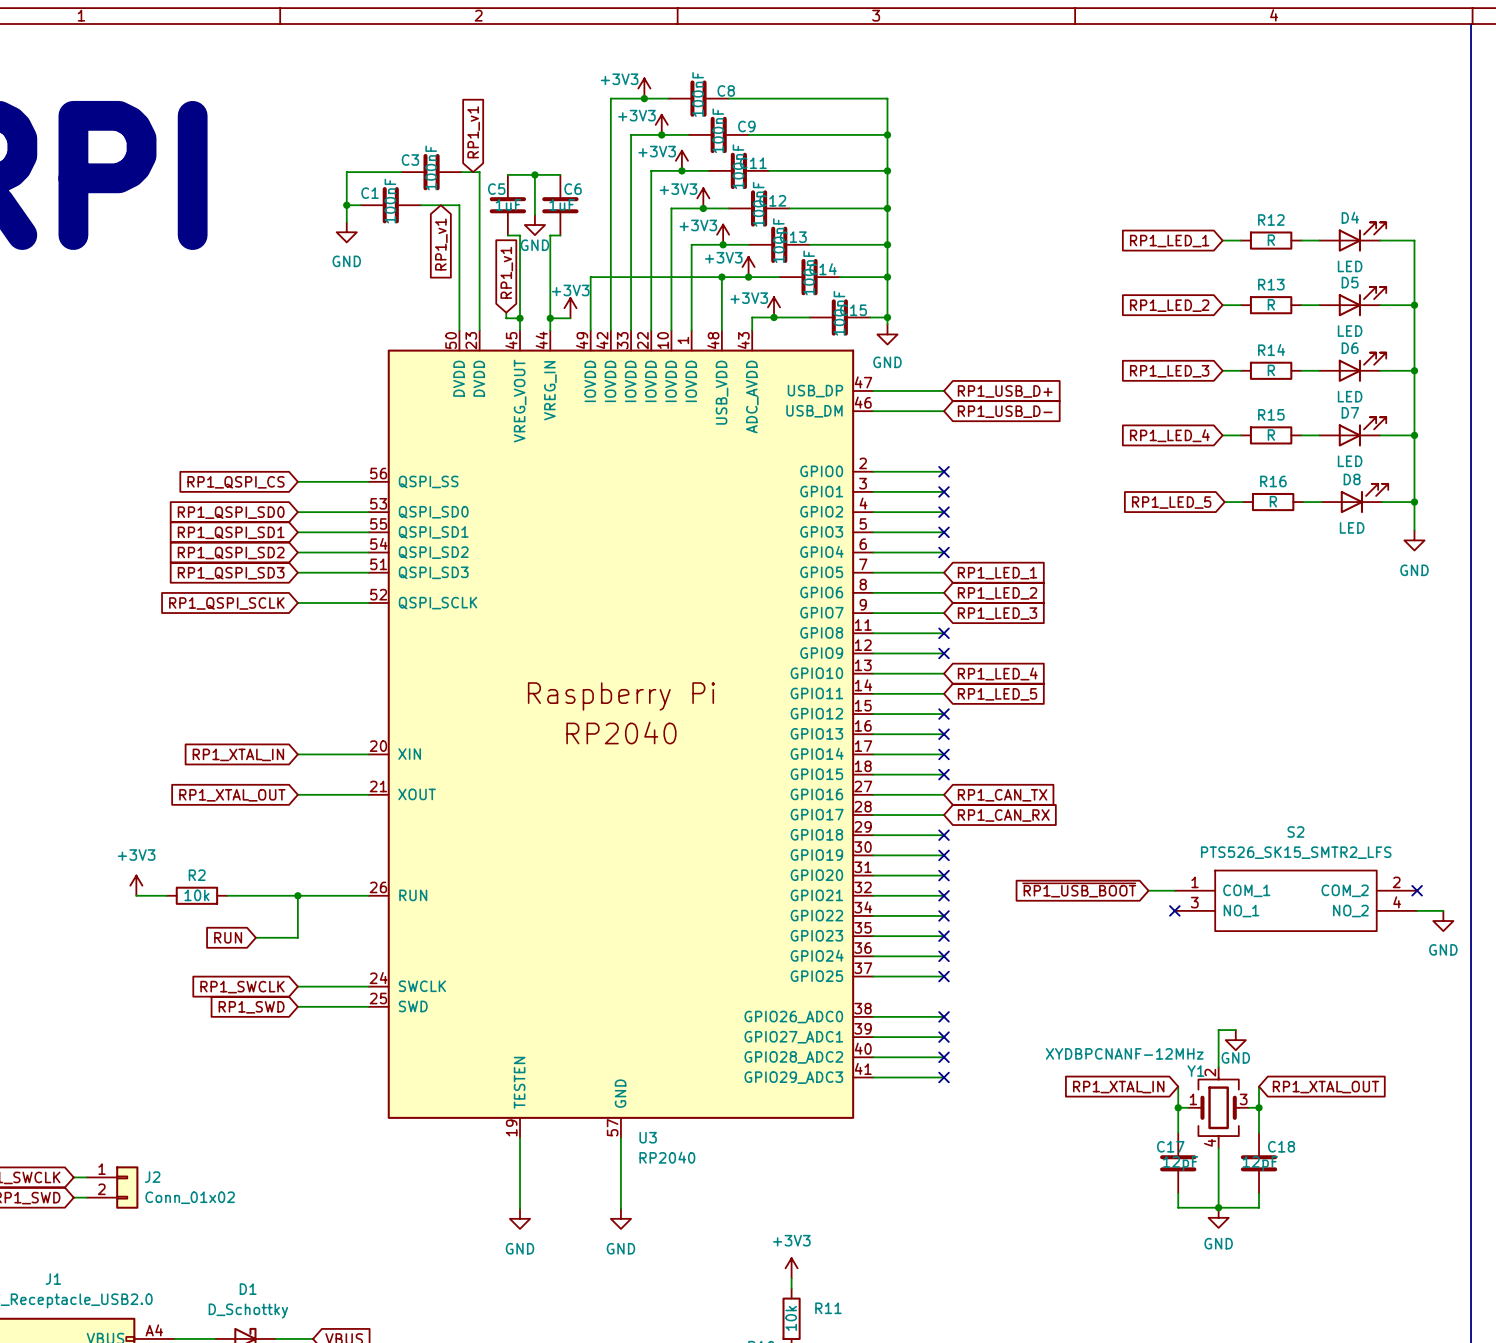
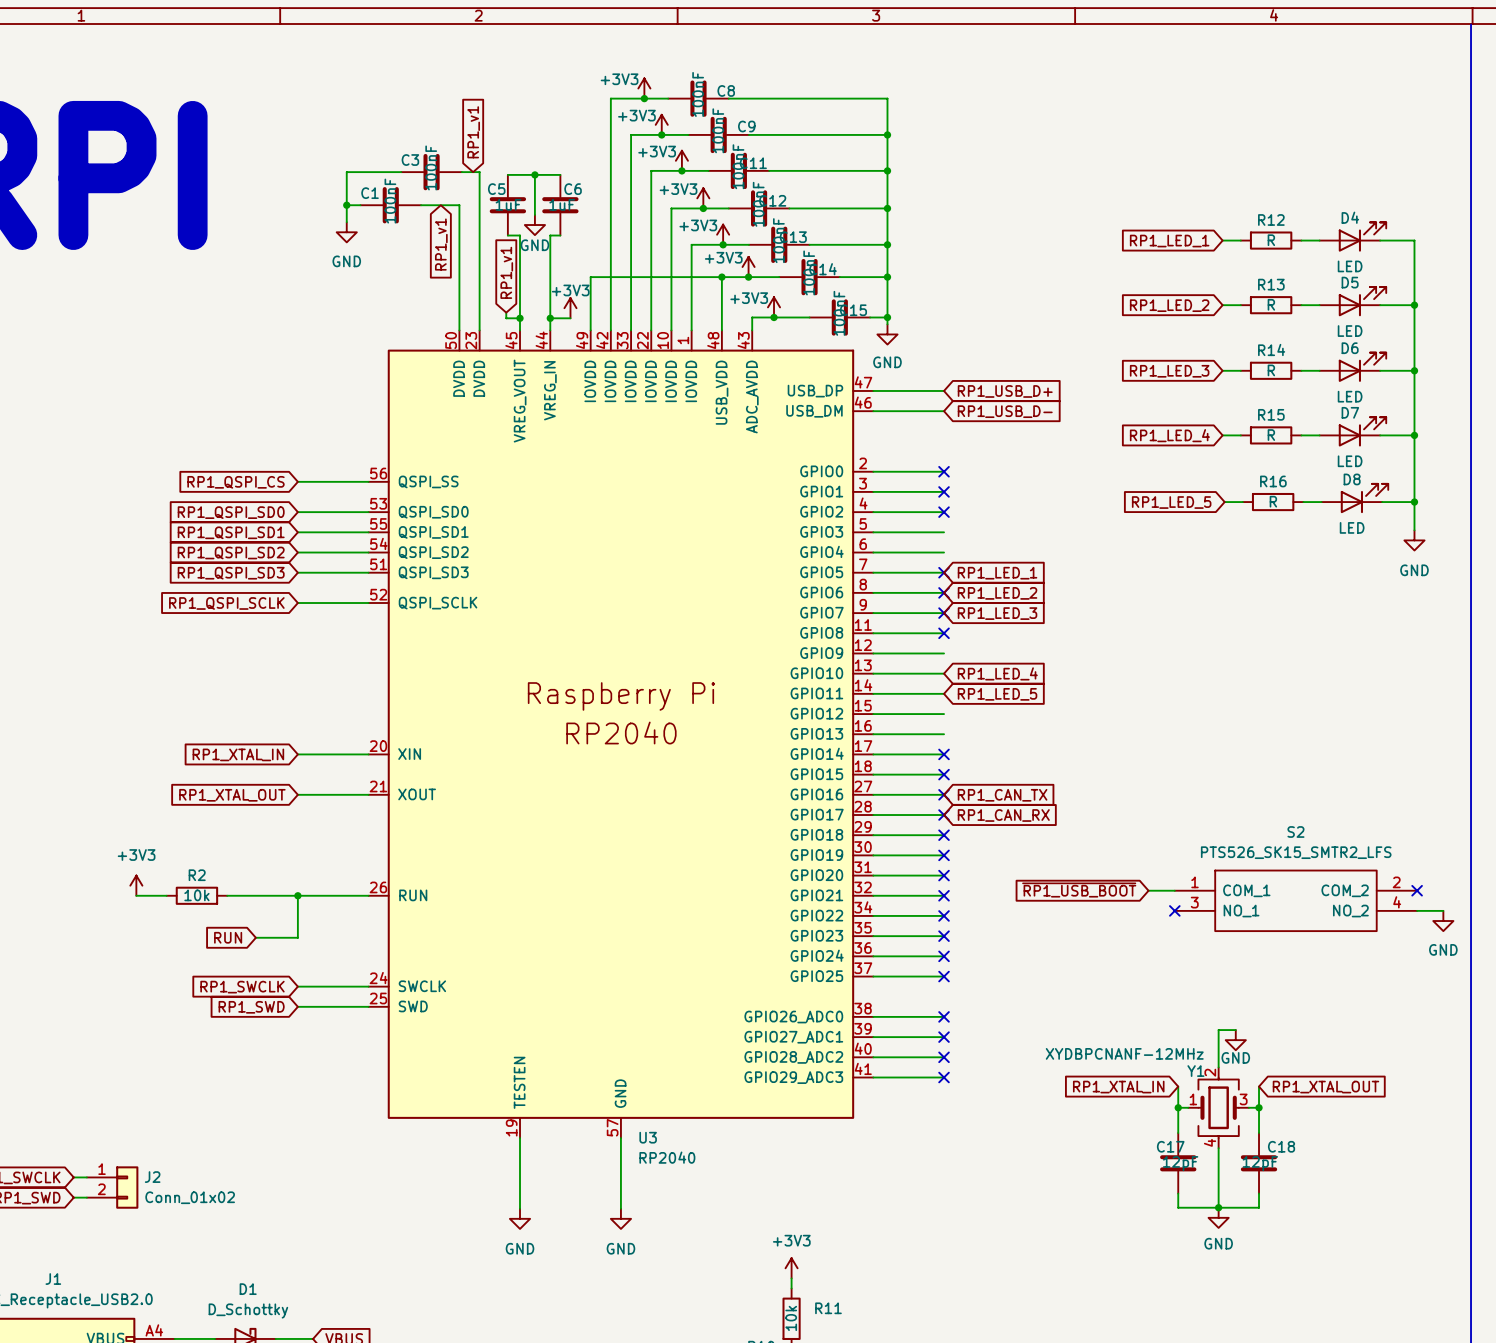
no-connect mark: (944, 532) -> none
no-connect mark: (944, 552) -> none
no-connect mark: none -> (944, 572)
no-connect mark: none -> (944, 592)
no-connect mark: none -> (944, 613)
no-connect mark: (944, 653) -> none
no-connect mark: (944, 714) -> none
no-connect mark: (944, 734) -> none
no-connect mark: none -> (944, 794)
no-connect mark: none -> (944, 815)

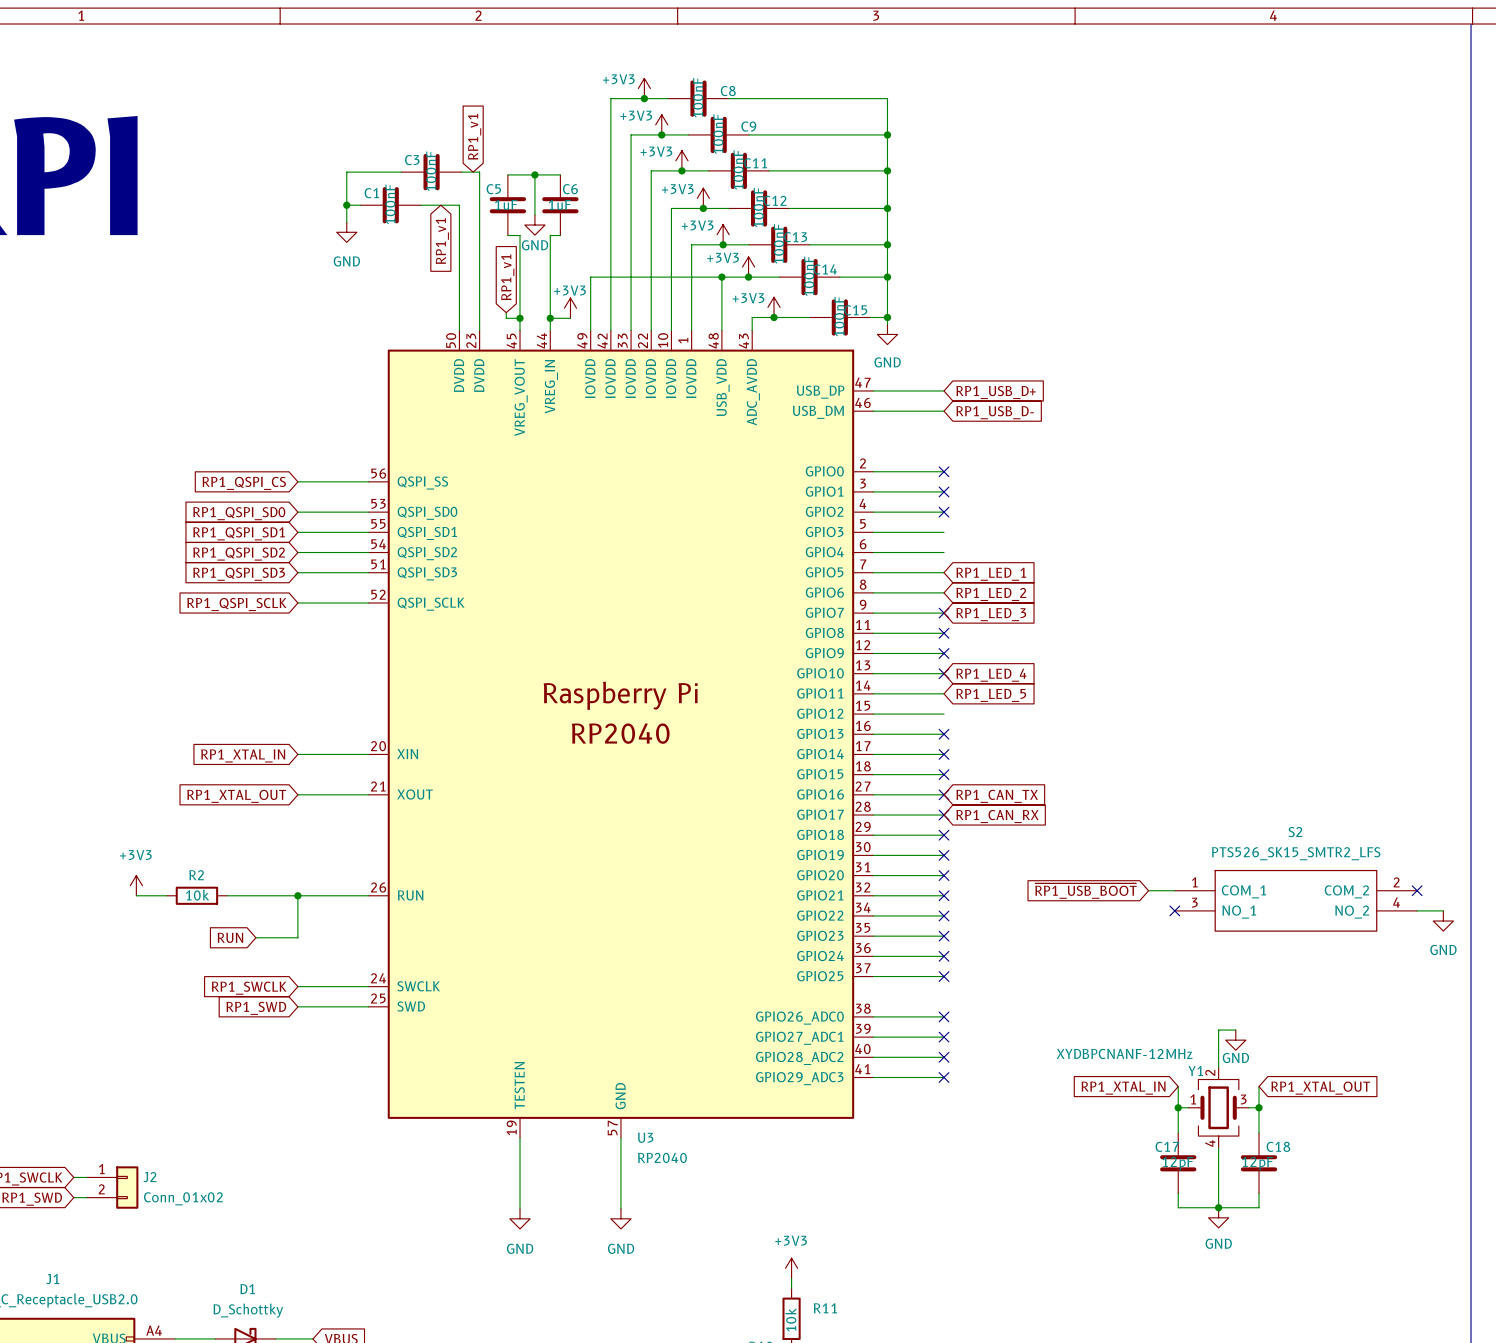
D4: LED (1352, 237) -> none
wire: (1222, 240) (1240, 240) -> none
R12: R (1271, 240) -> none
wire: (1301, 240) (1319, 240) -> none
wire: (1380, 240) (1414, 240) (1414, 530) -> none
global label: RP1_LED_1 (1169, 241) -> none
D5: LED (1352, 301) -> none
global label: RP1_LED_2 (1169, 305) -> none
wire: (1222, 305) (1240, 305) -> none
R13: R (1271, 305) -> none
wire: (1301, 305) (1319, 305) -> none
wire: (1380, 305) (1414, 305) -> none
junction: (1414, 305) -> none
D6: LED (1352, 367) -> none
wire: (1222, 370) (1240, 370) -> none
R14: R (1271, 370) -> none
wire: (1301, 370) (1319, 370) -> none
wire: (1380, 370) (1414, 370) -> none
junction: (1414, 370) -> none
global label: RP1_LED_3 (1169, 371) -> none
D7: LED (1352, 431) -> none
global label: RP1_LED_4 (1169, 435) -> none
wire: (1222, 435) (1240, 435) -> none
R15: R (1271, 435) -> none
wire: (1301, 435) (1319, 435) -> none
wire: (1380, 435) (1414, 435) -> none
junction: (1414, 435) -> none
D8: LED (1354, 498) -> none
global label: RP1_LED_5 (1171, 502) -> none
wire: (1224, 502) (1242, 502) -> none
R16: R (1273, 502) -> none
wire: (1303, 502) (1321, 502) -> none
wire: (1382, 502) (1414, 502) -> none
junction: (1414, 502) -> none
power symbol: GND (1414, 540) -> none
no-connect mark: (944, 572) -> none
no-connect mark: (944, 592) -> none
no-connect mark: none -> (944, 653)
no-connect mark: none -> (944, 673)
no-connect mark: none -> (944, 734)

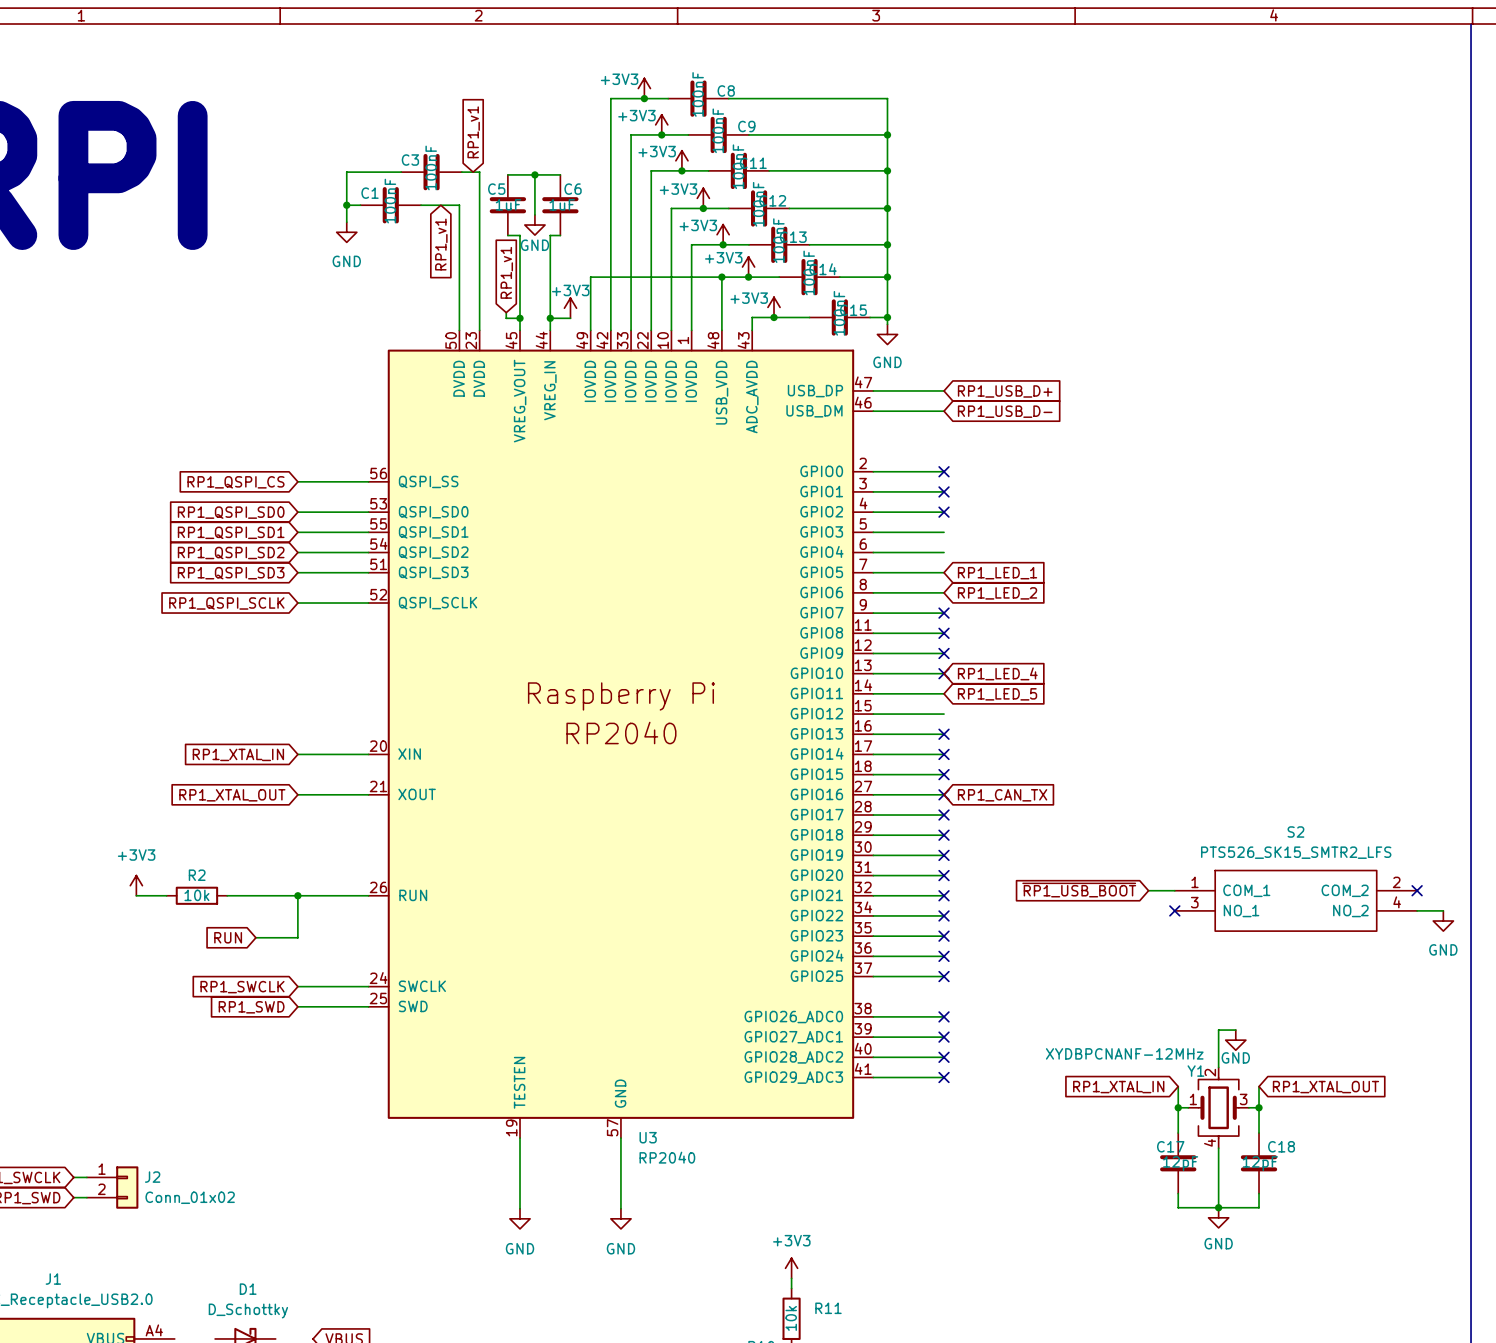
global label: RP1_LED_3 (991, 614) -> none
global label: RP1_CAN_RX (997, 816) -> none
wire: (174, 1338) (215, 1338) -> none
wire: (275, 1338) (313, 1338) -> none

